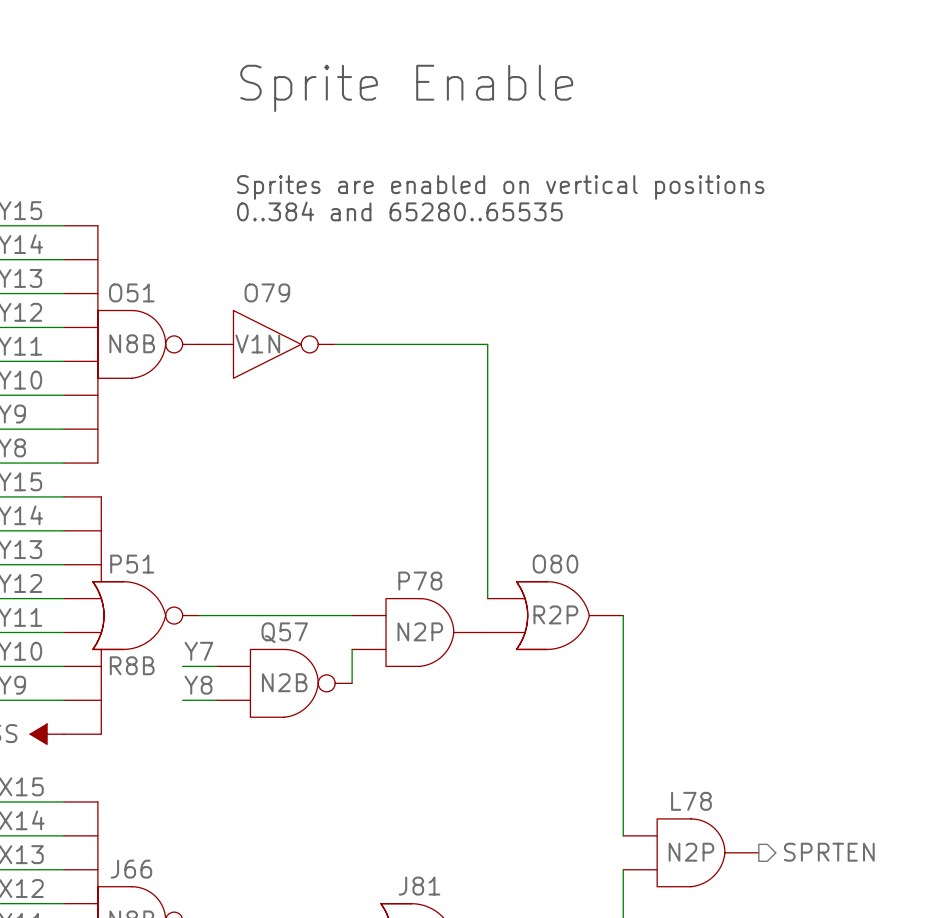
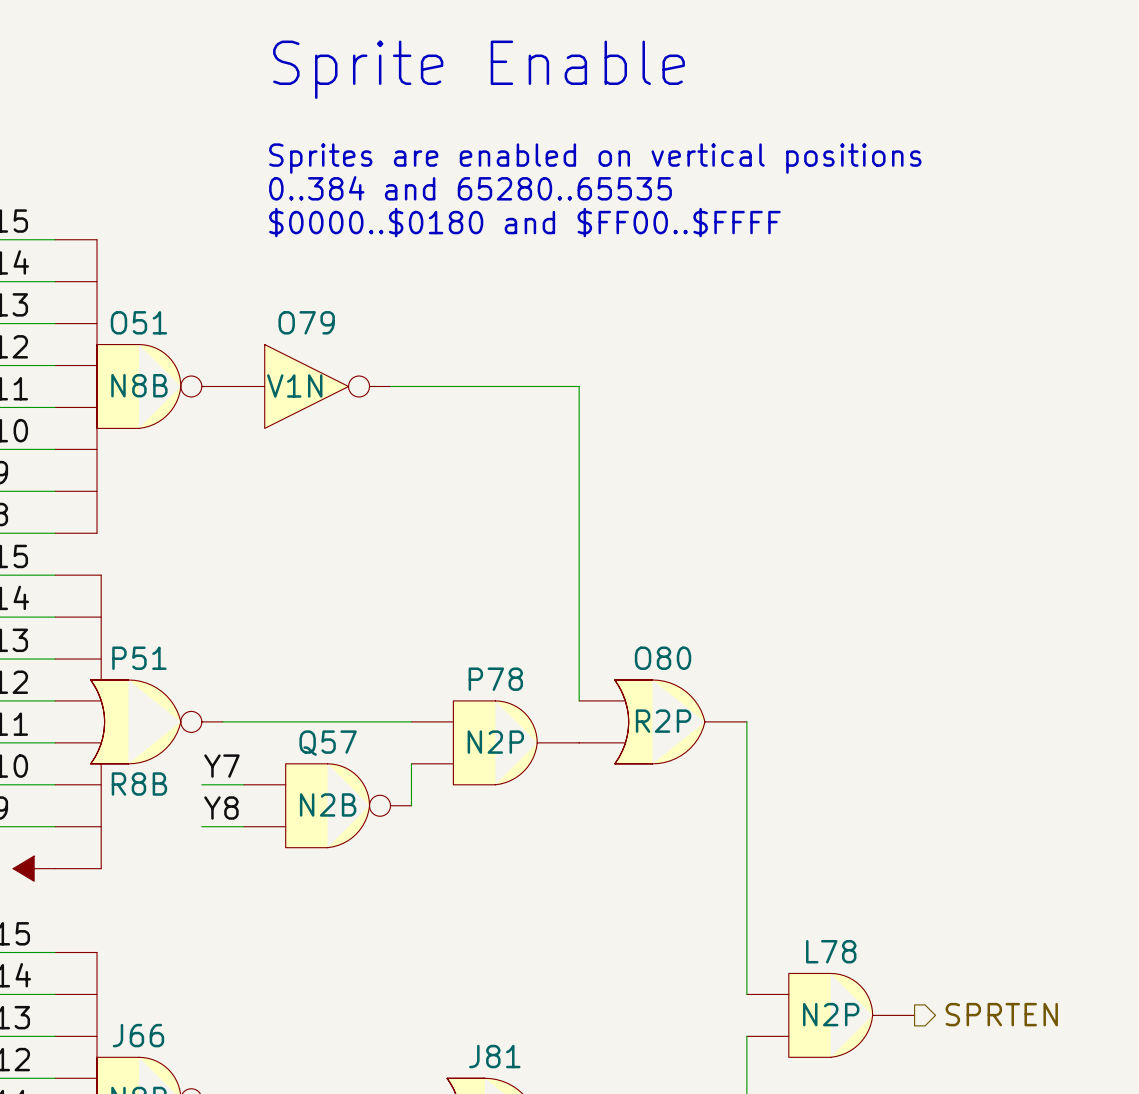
text: none -> Sprites are enabled on vertical positions (595, 158)
text: Sprites are enabled on vertical positions (500, 187) -> 0..384 and 65280..65535 (470, 188)
text: 0..384 and 65280..65535 (399, 211) -> $0000..$0180 and $FF00..$FFFF (524, 222)

